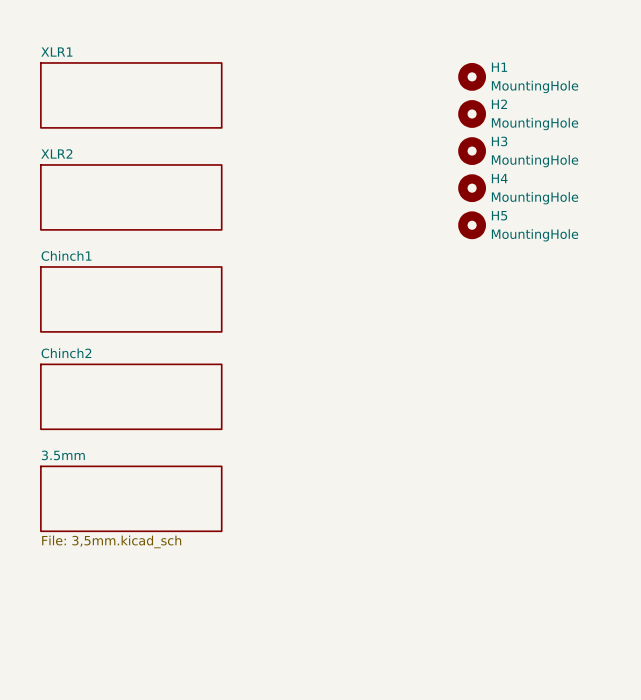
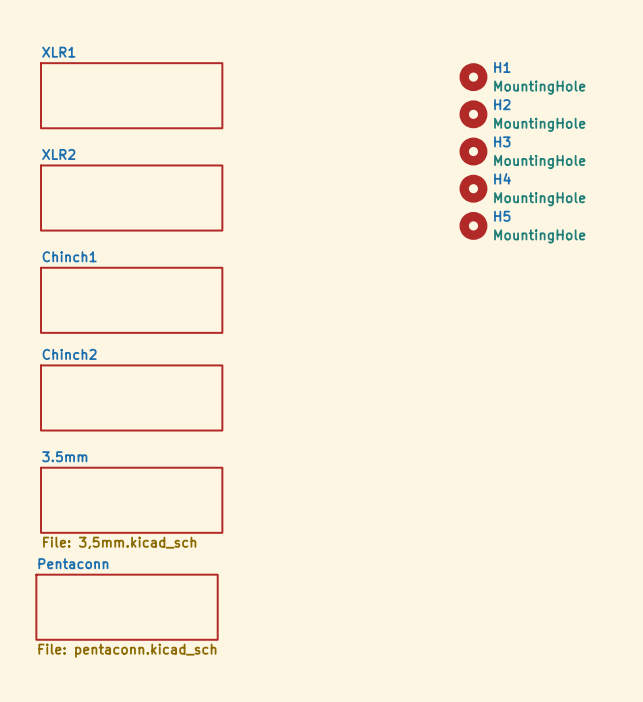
sheet Pentaconn: none -> File: pentaconn.kicad_sch (127, 607)

